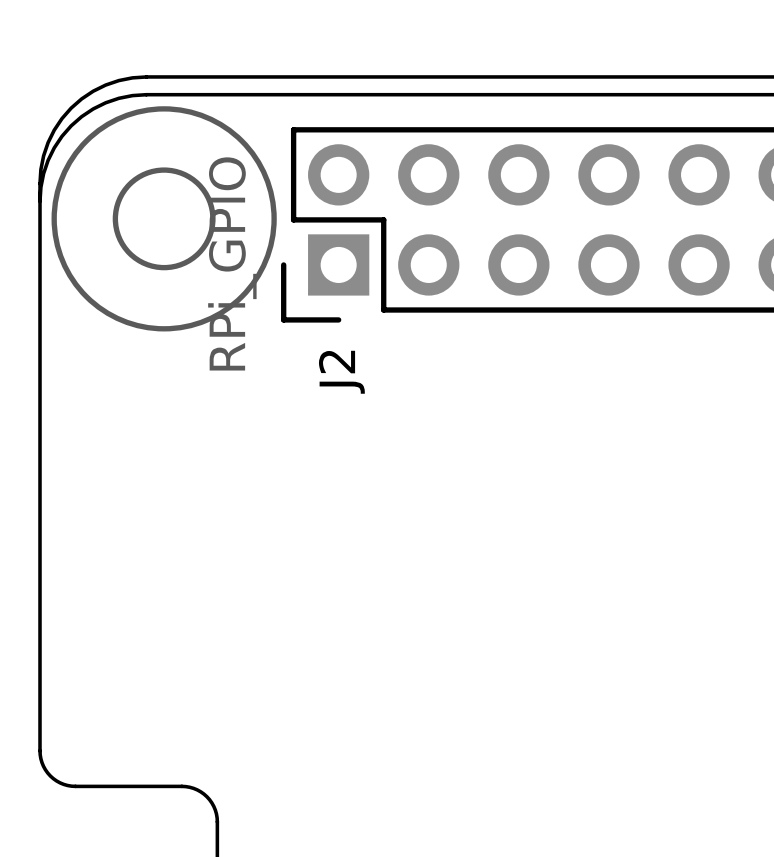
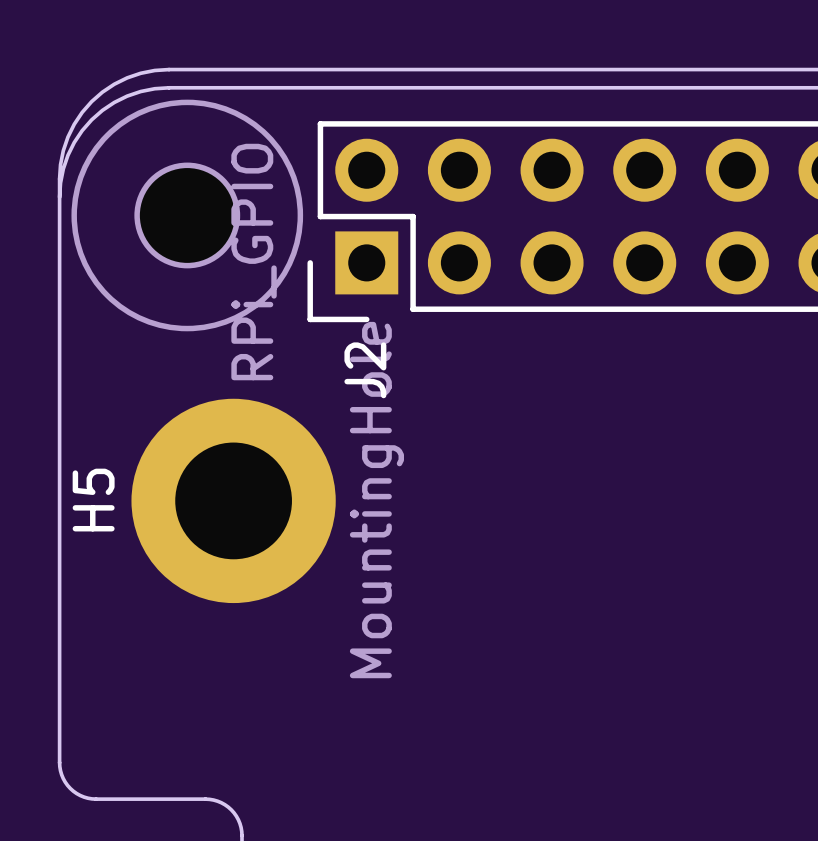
H5: none -> MountingHole (233, 500)

